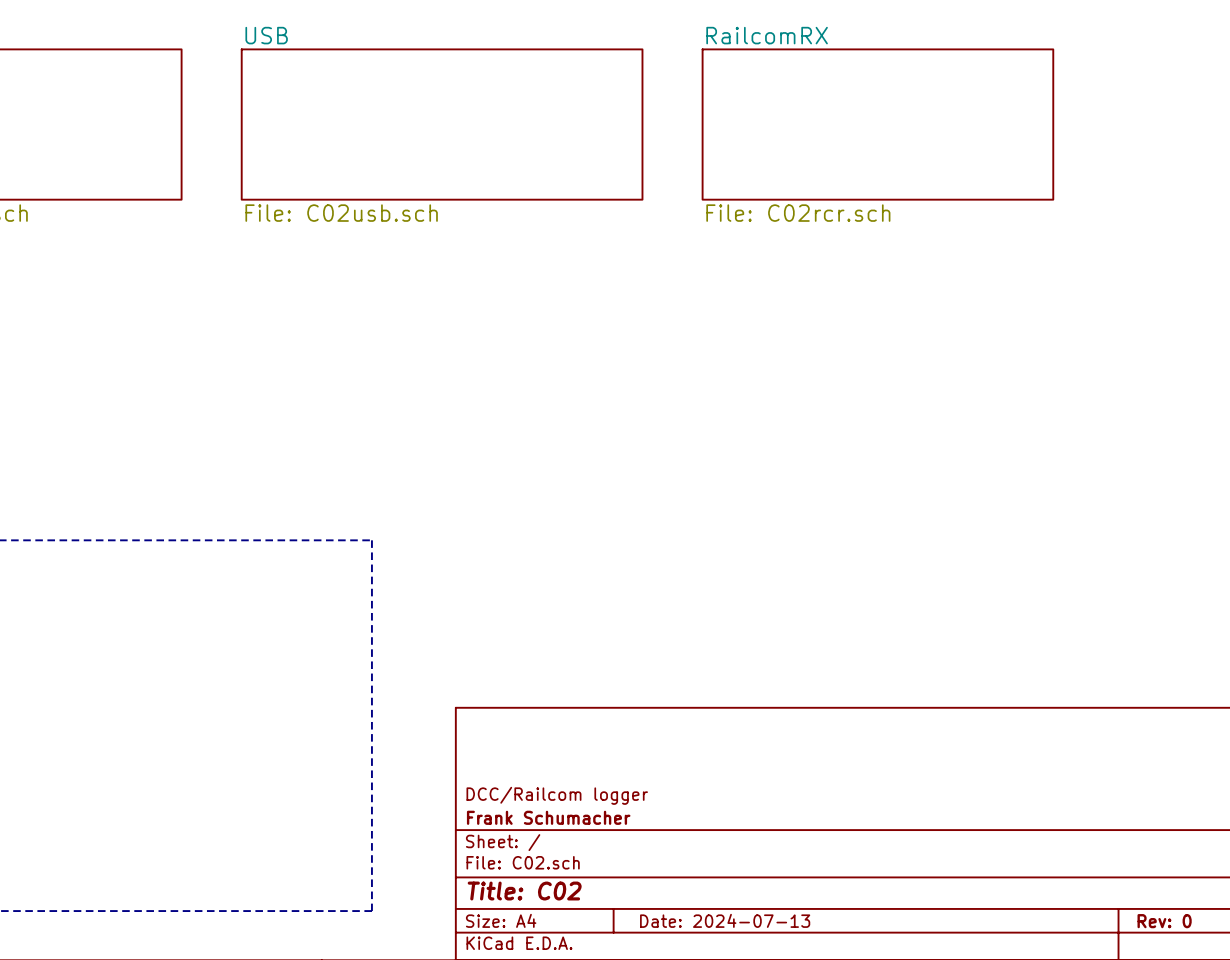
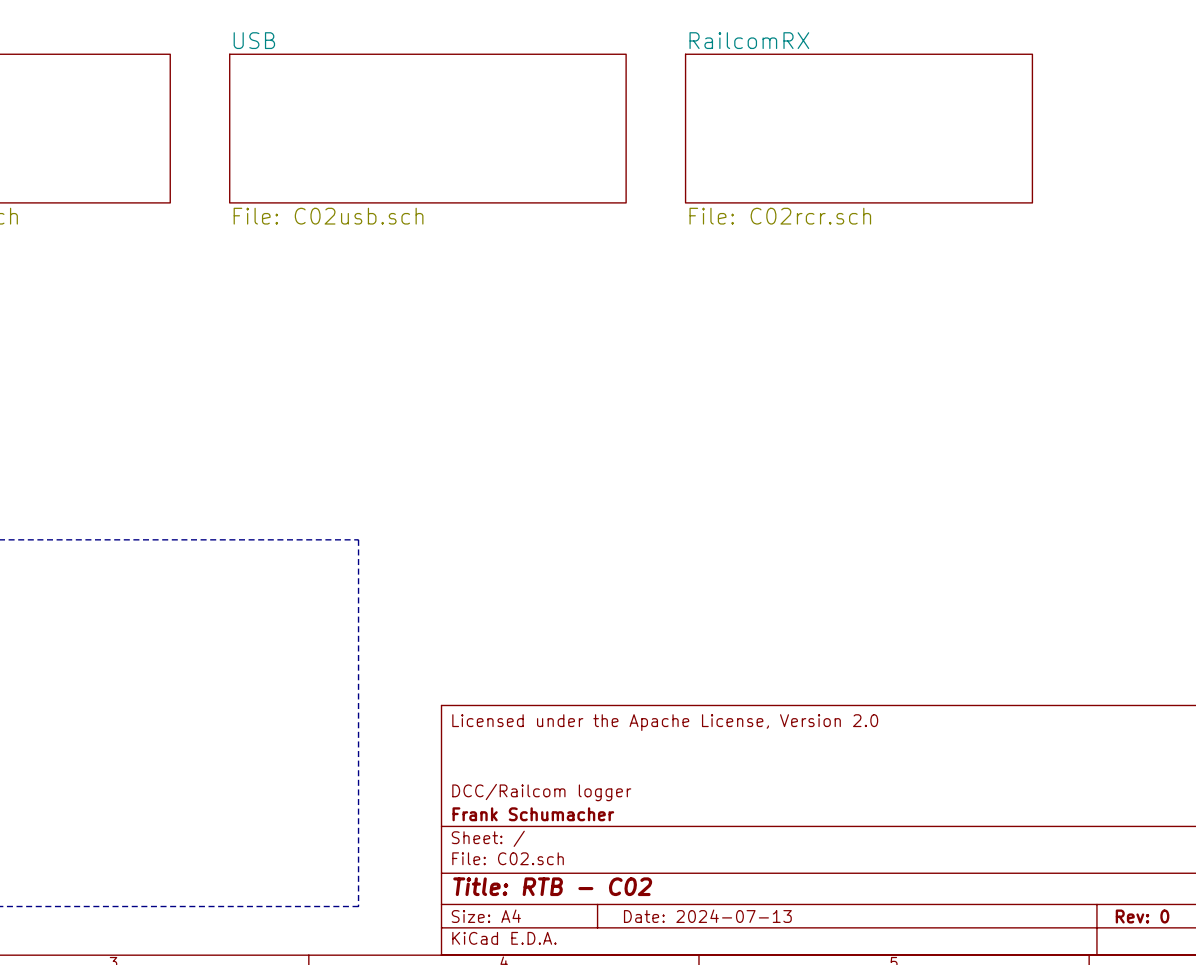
title block: none -> Licensed under the Apache License, Version 2.0 (665, 722)
title block: Title: C02 (524, 891) -> Title: RTB - C02 (552, 886)

